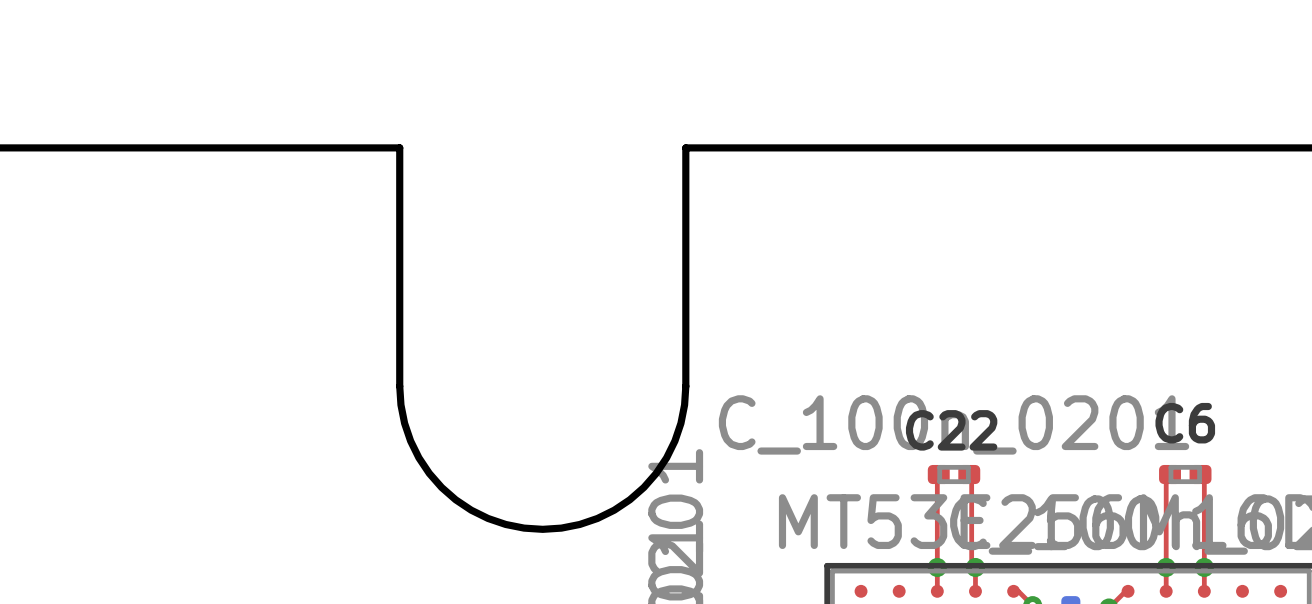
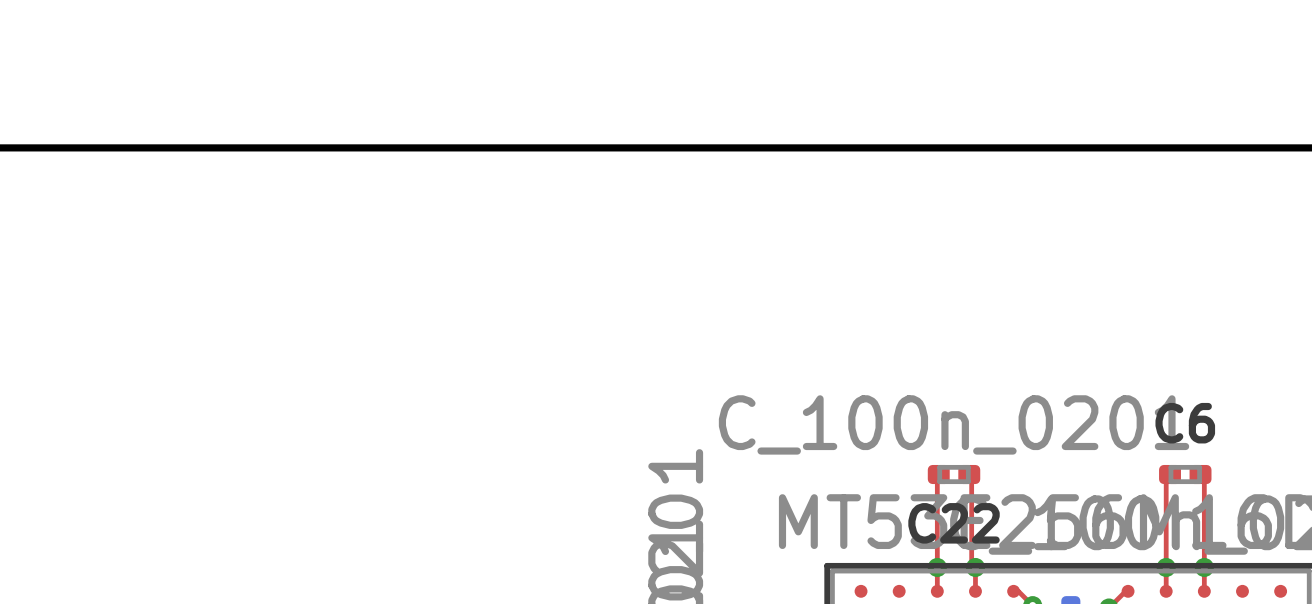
board edge: (399, 147) (399, 386) (400, 404) (410, 441) (429, 473) (455, 499) (471, 510) (505, 524) (542, 529) (579, 524) (614, 510) (629, 499) (656, 473) (674, 441) (684, 404) (685, 386) (685, 147) -> (399, 147) (685, 147)
C22 name position: C22 (951, 430) -> C22 (954, 523)

